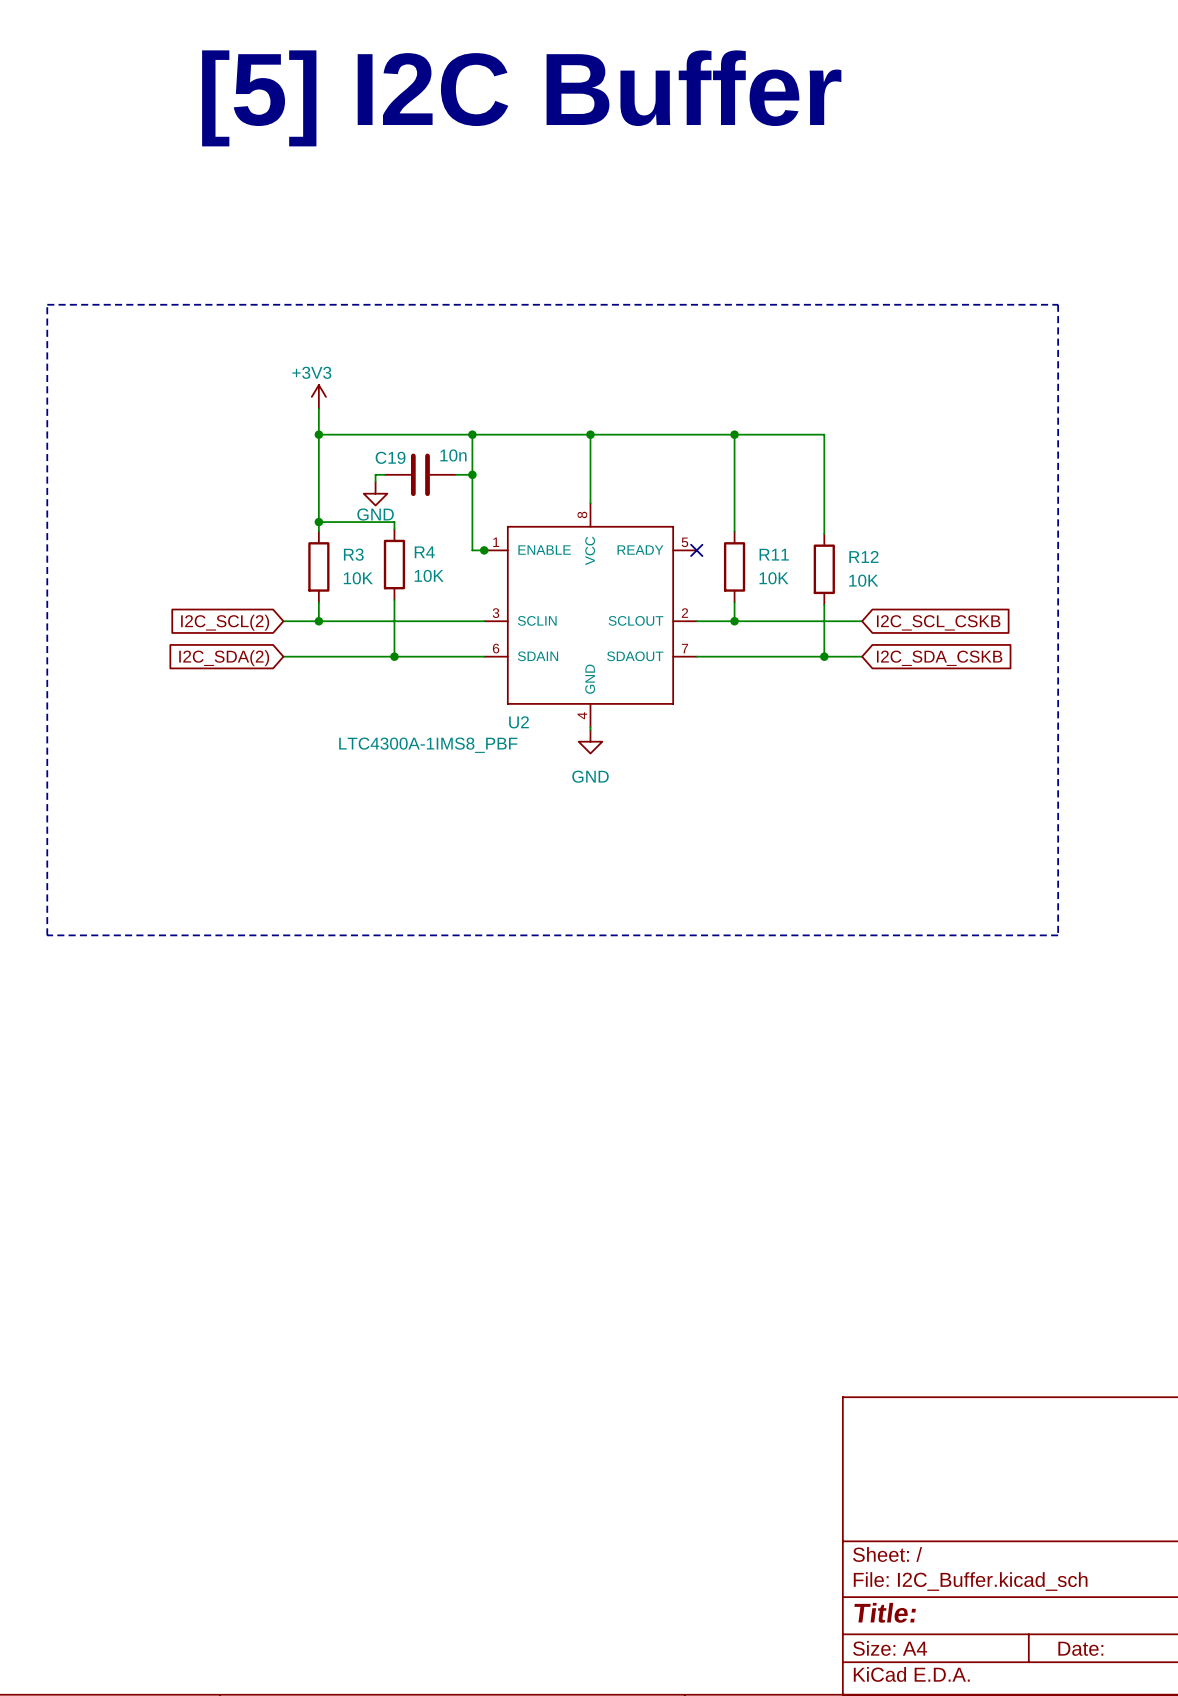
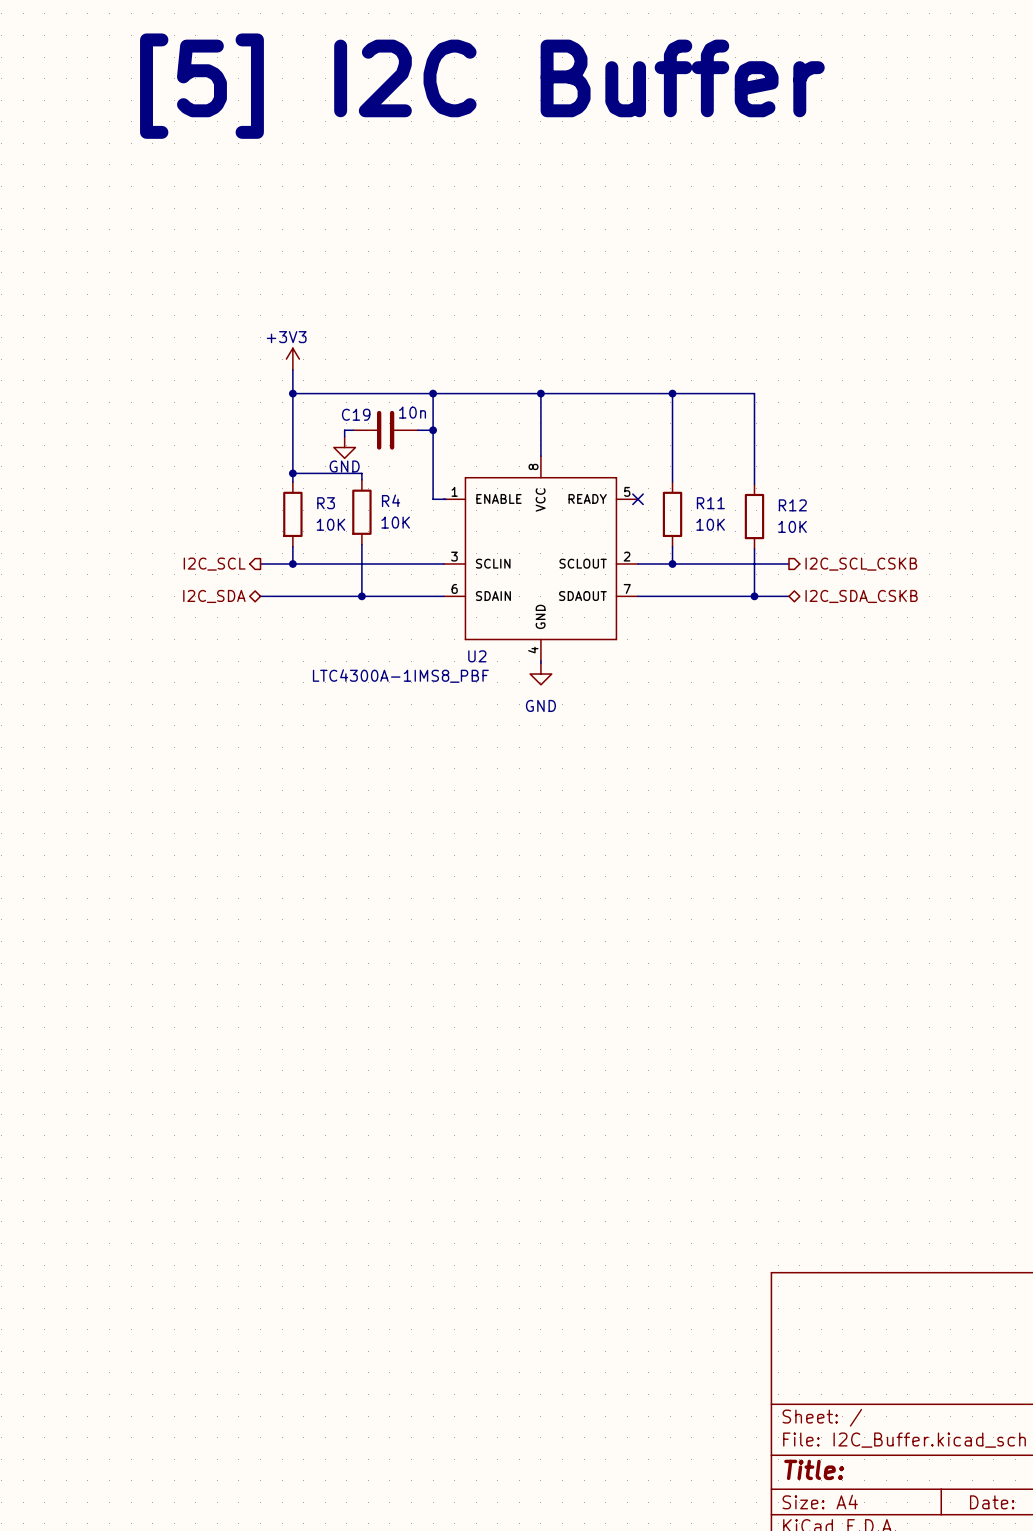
line: (47, 304) (1058, 304) (1058, 935) (47, 935) (47, 304) -> none
junction: (484, 550) -> none
global label: I2C_SCL(2) (225, 622) -> none
hierarchical label: none -> I2C_SCL (214, 564)
global label: I2C_SCL_CSKB (938, 622) -> none
hierarchical label: none -> I2C_SCL_CSKB (861, 564)
hierarchical label: none -> I2C_SDA (214, 596)
hierarchical label: none -> I2C_SDA_CSKB (861, 596)
global label: I2C_SDA(2) (224, 658) -> none
global label: I2C_SDA_CSKB (939, 658) -> none

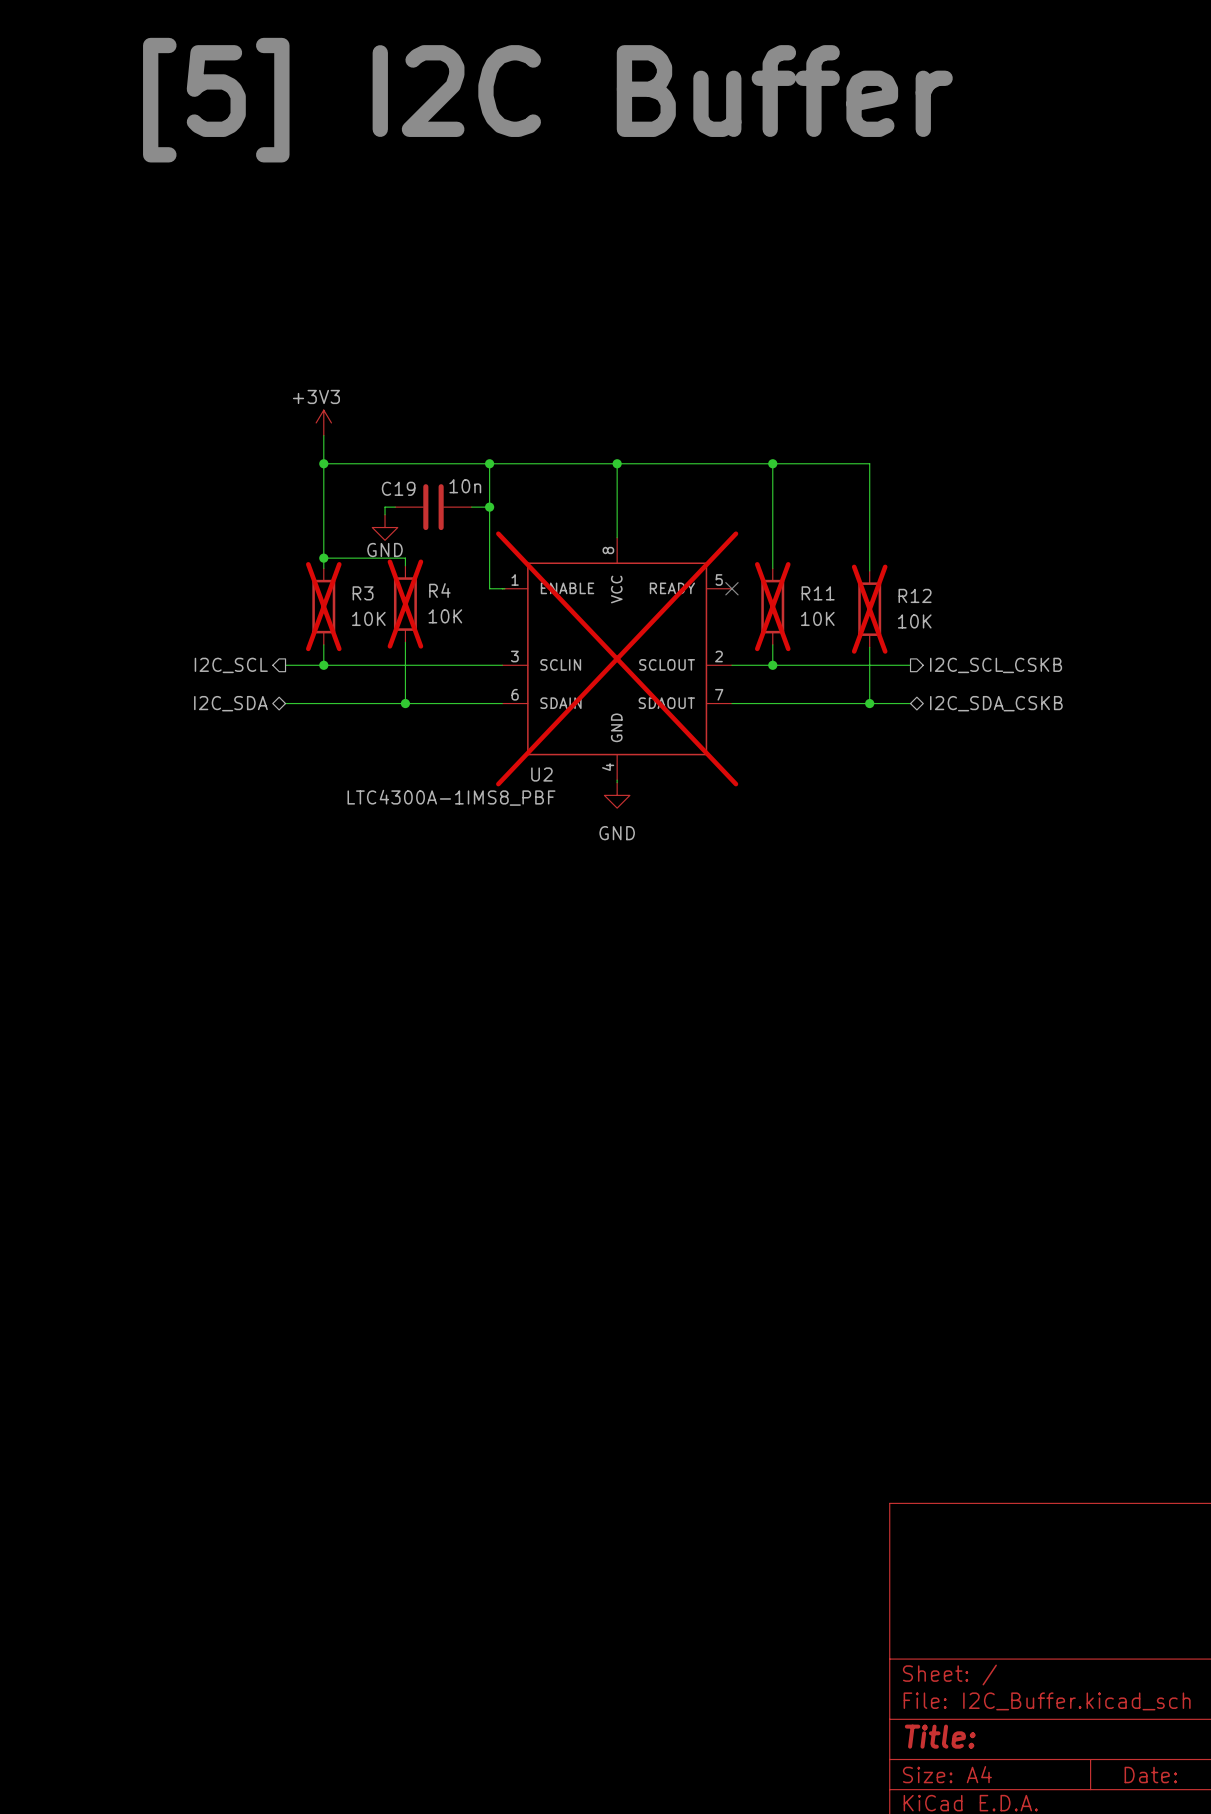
R4 do-not-place cross: none -> (405, 604)
R3 do-not-place cross: none -> (323, 606)
R11 do-not-place cross: none -> (772, 606)
R12 do-not-place cross: none -> (869, 609)
U2 do-not-place cross: none -> (617, 658)

